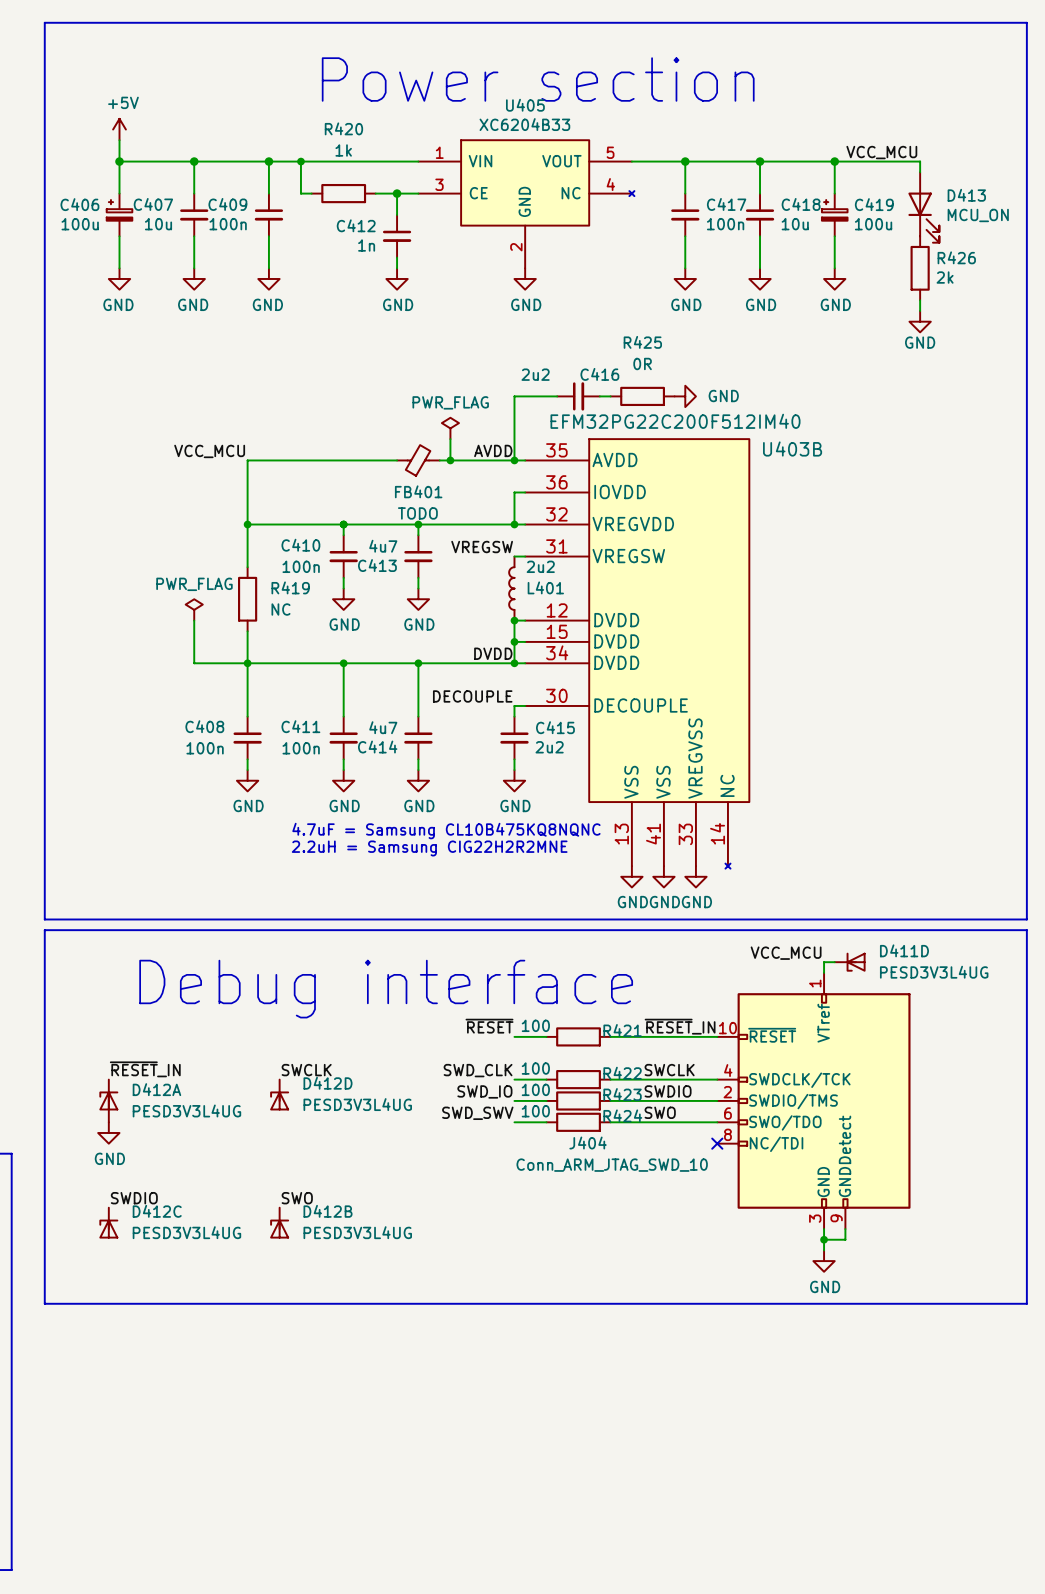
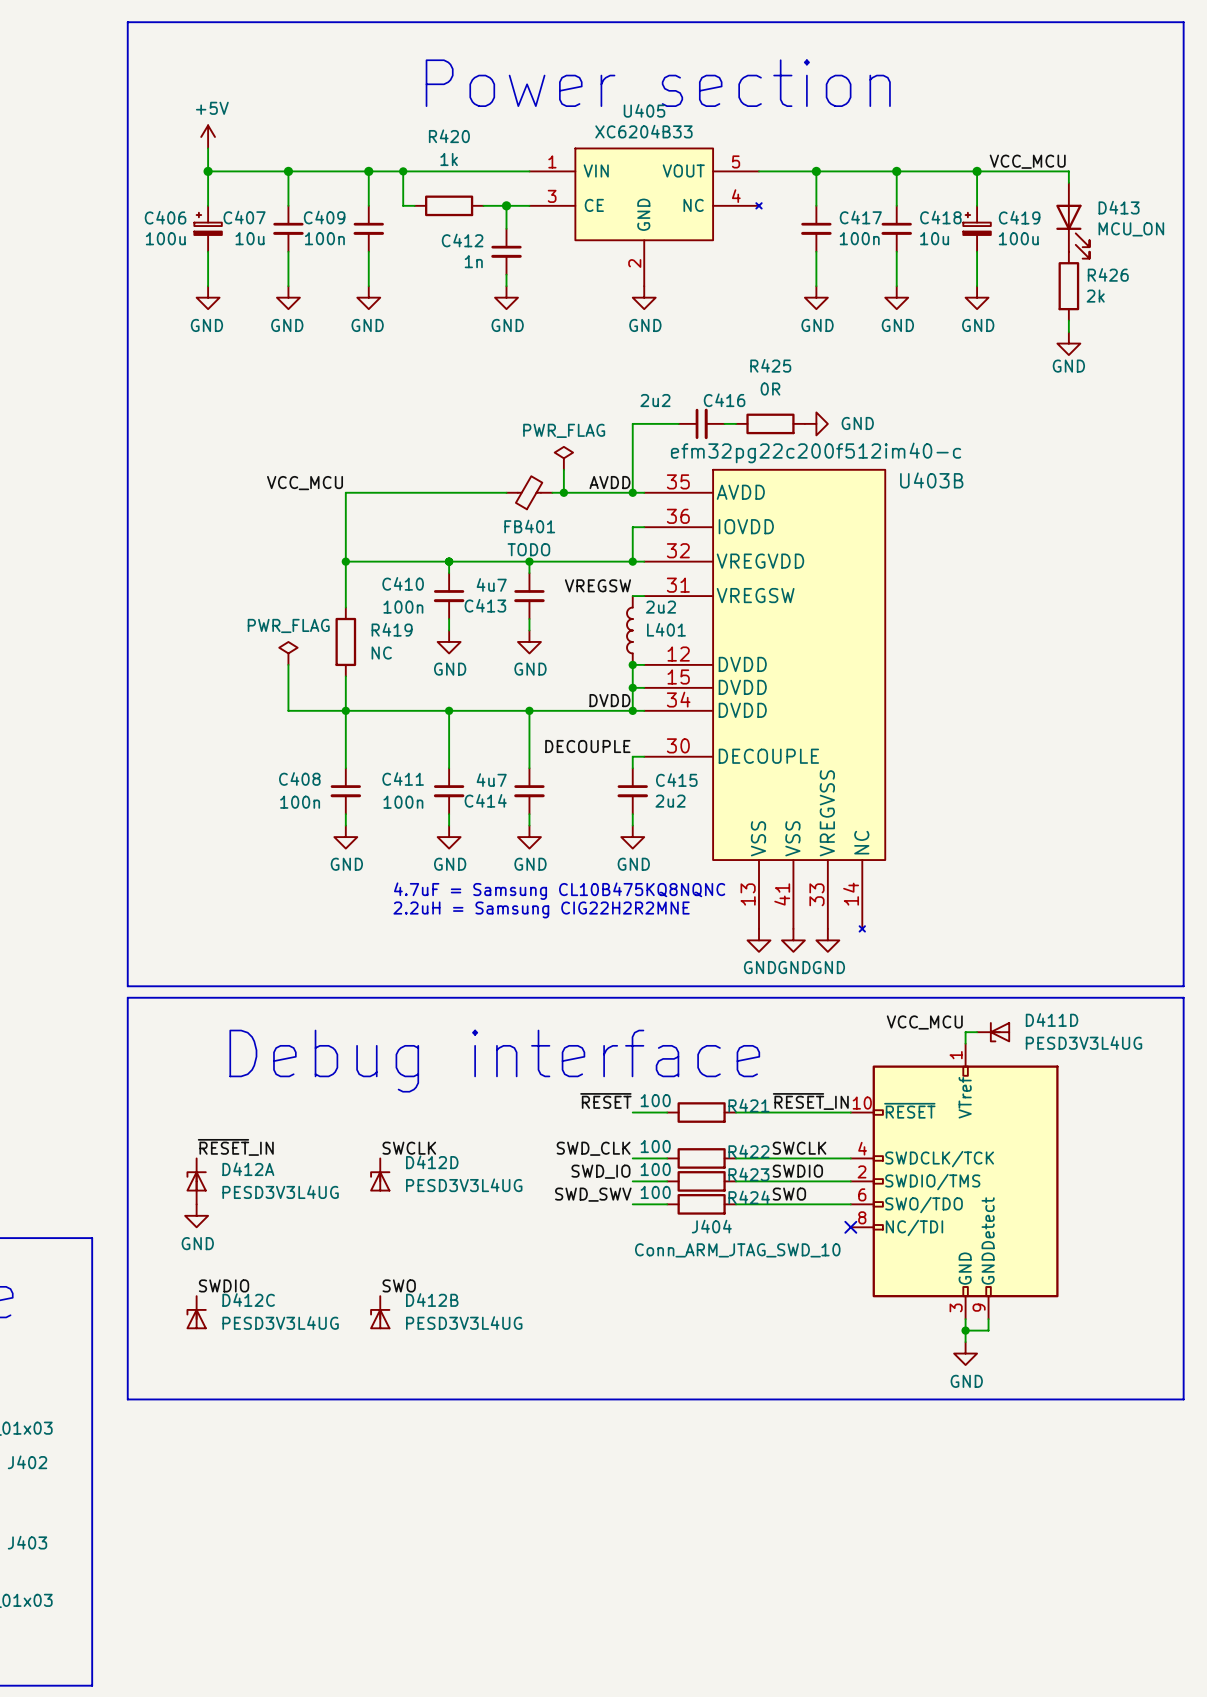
U403B value: EFM32PG22C200F512IM40 (675, 421) -> efm32pg22c200f512im40-c (816, 452)

